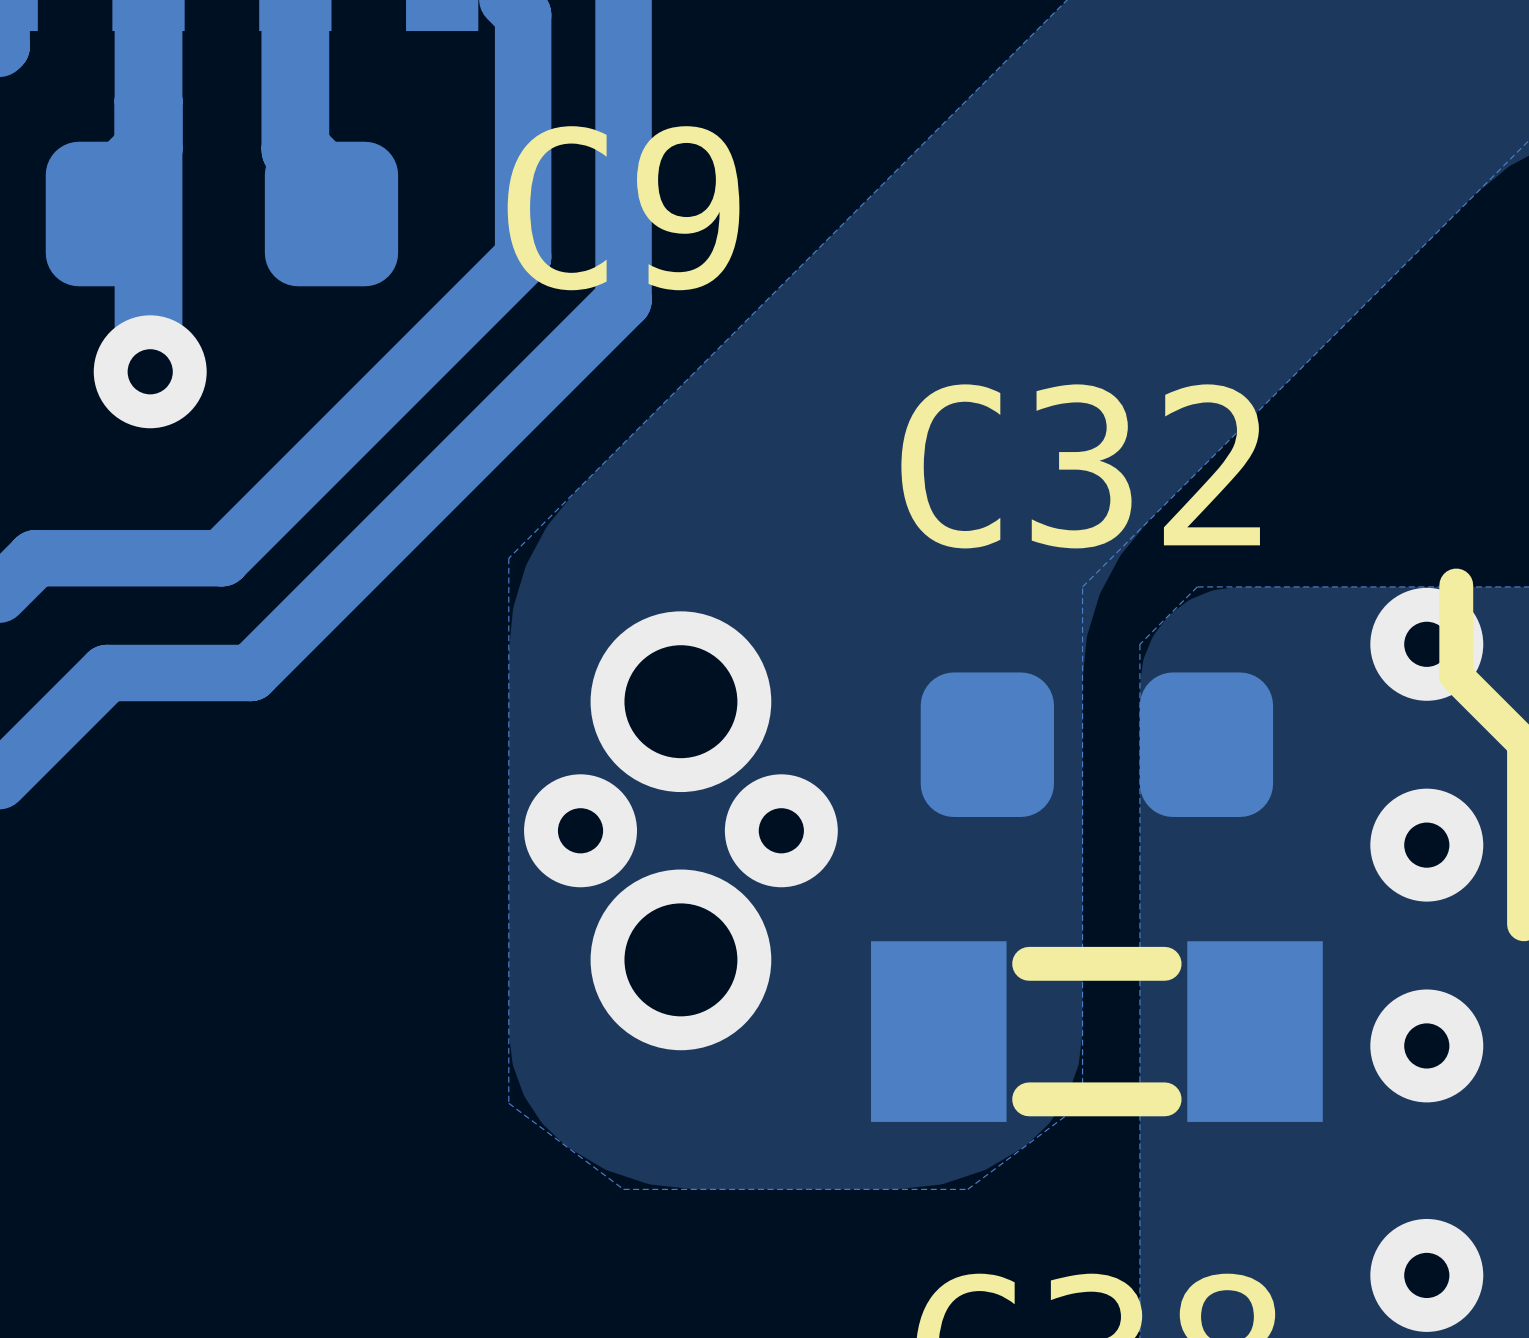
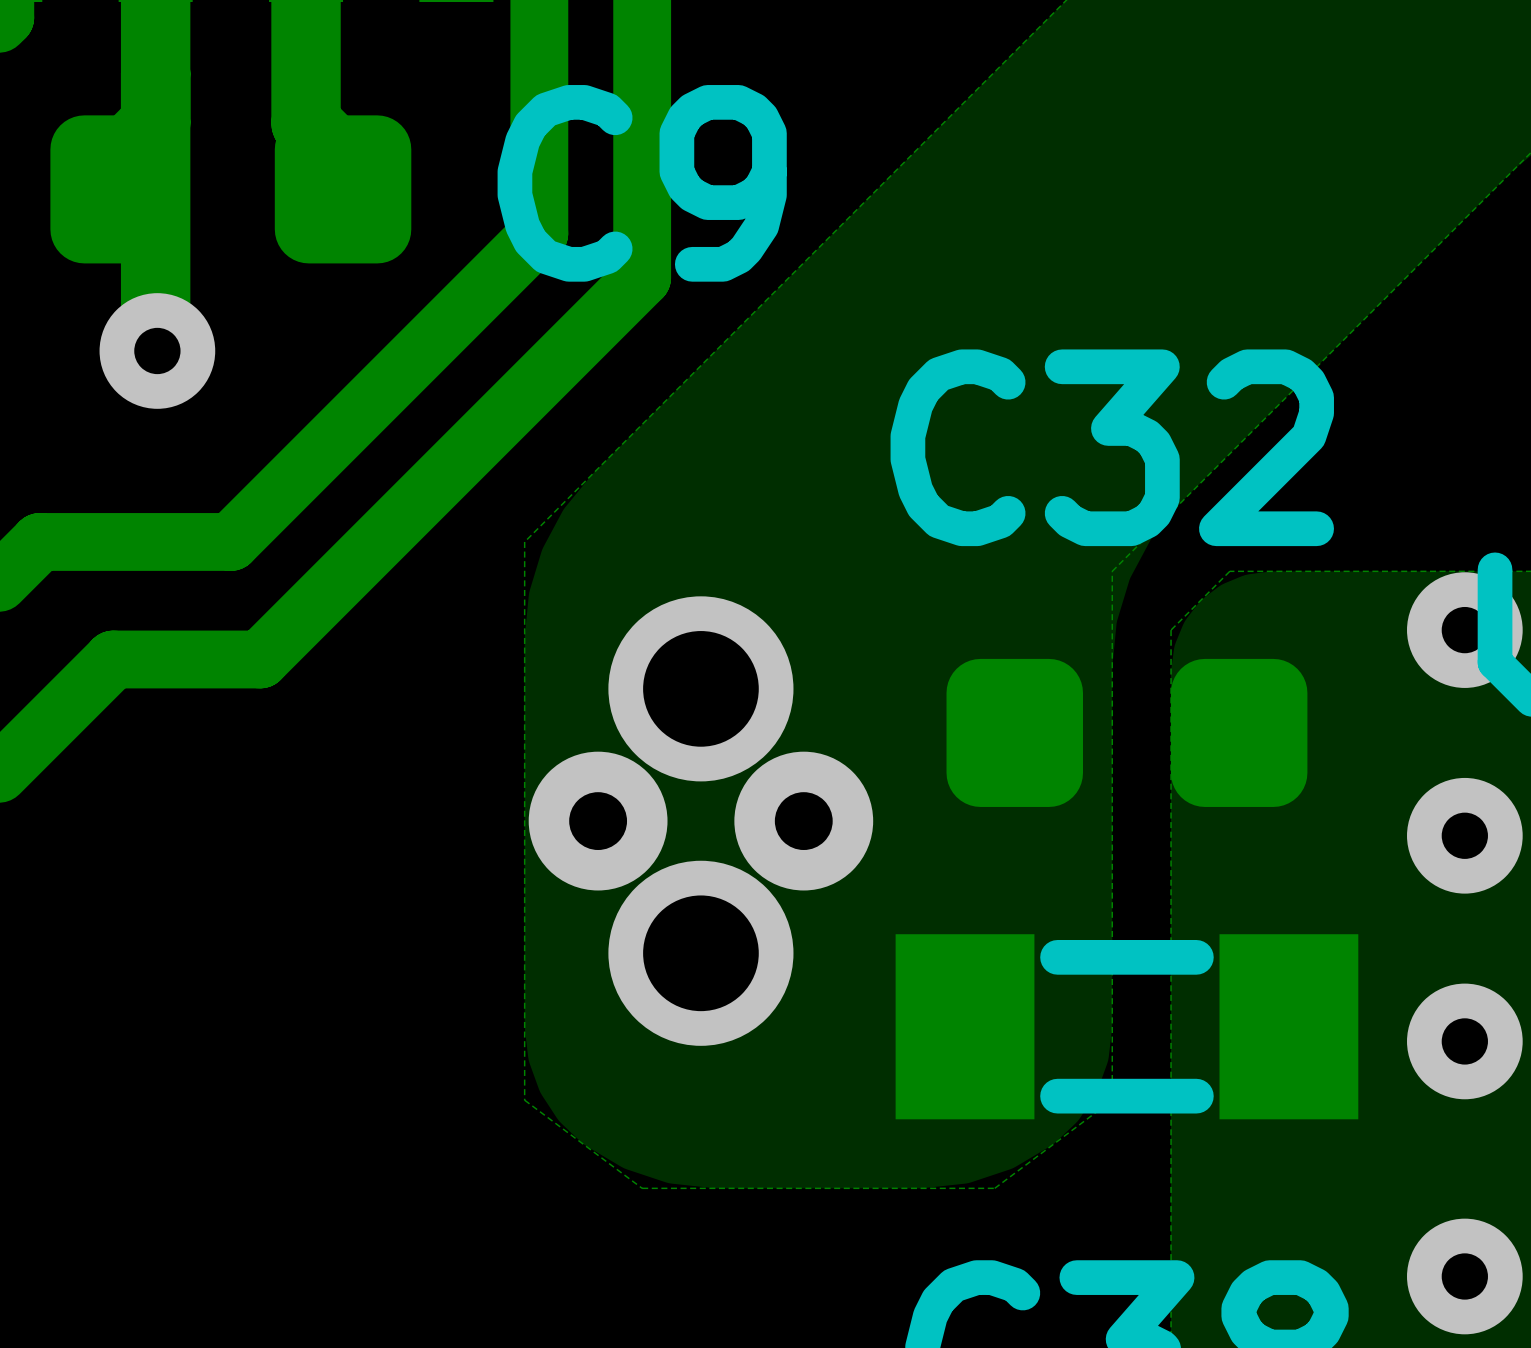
via size: [524, 774, 637, 888] -> [528, 751, 668, 891]
via size: [724, 774, 838, 888] -> [734, 751, 874, 891]

